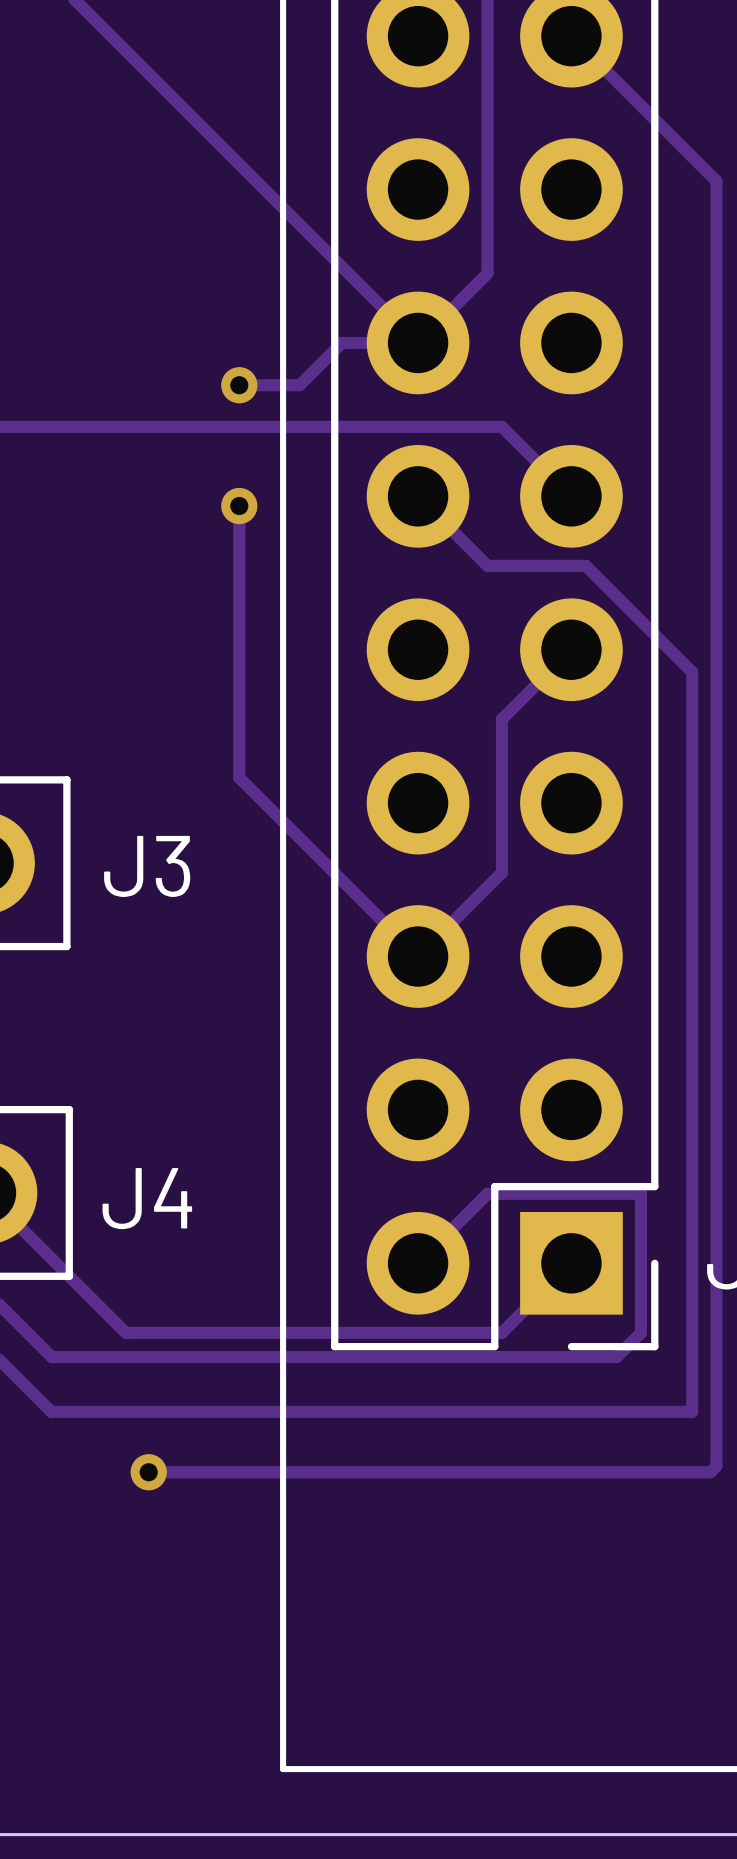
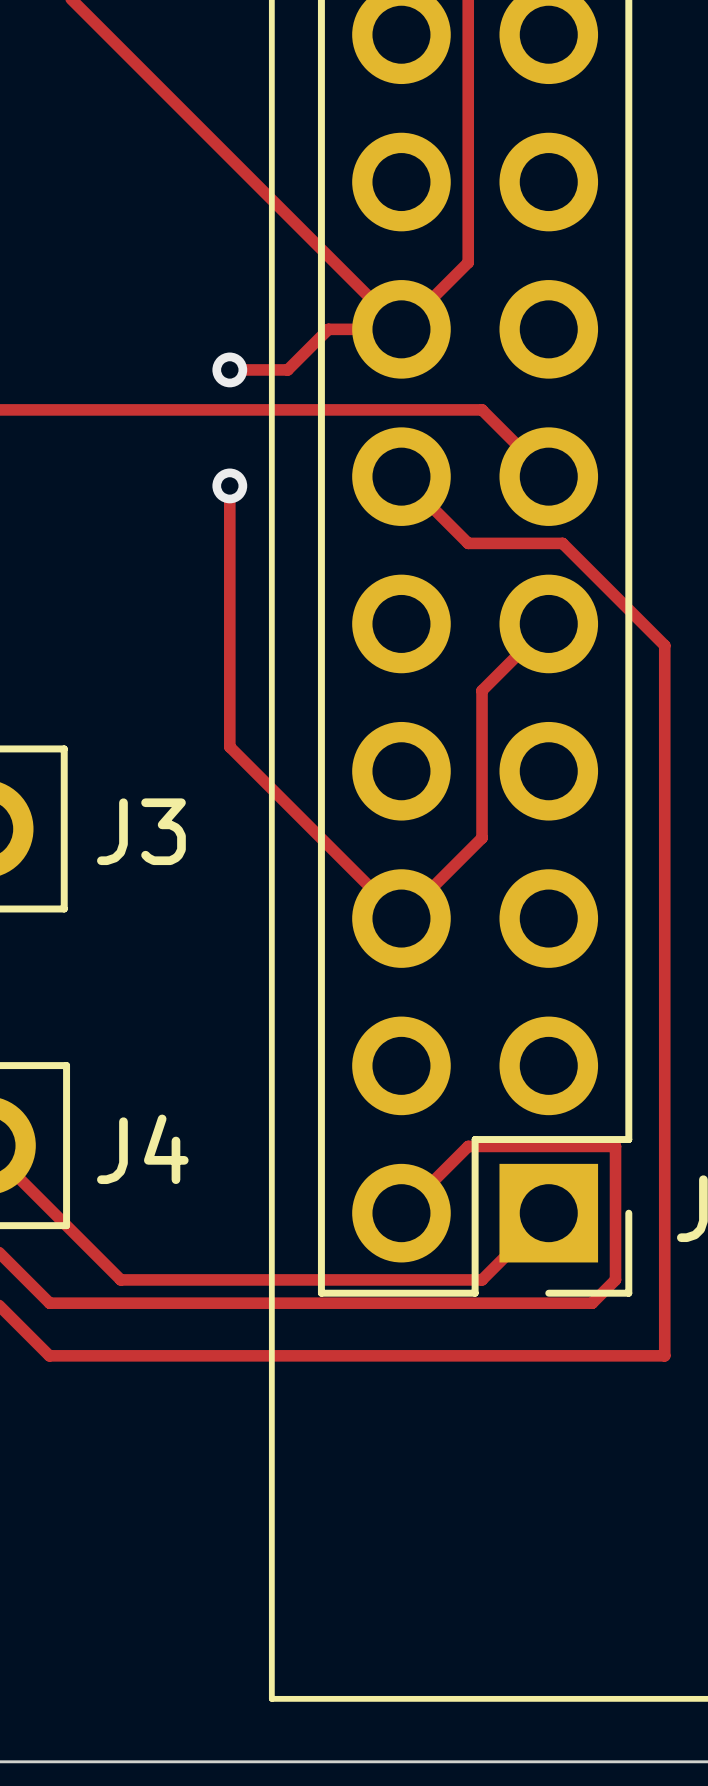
track: (571, 36) (716, 181) (716, 1466) (710, 1472) (148, 1472) -> none
via: (148, 1472) -> none

